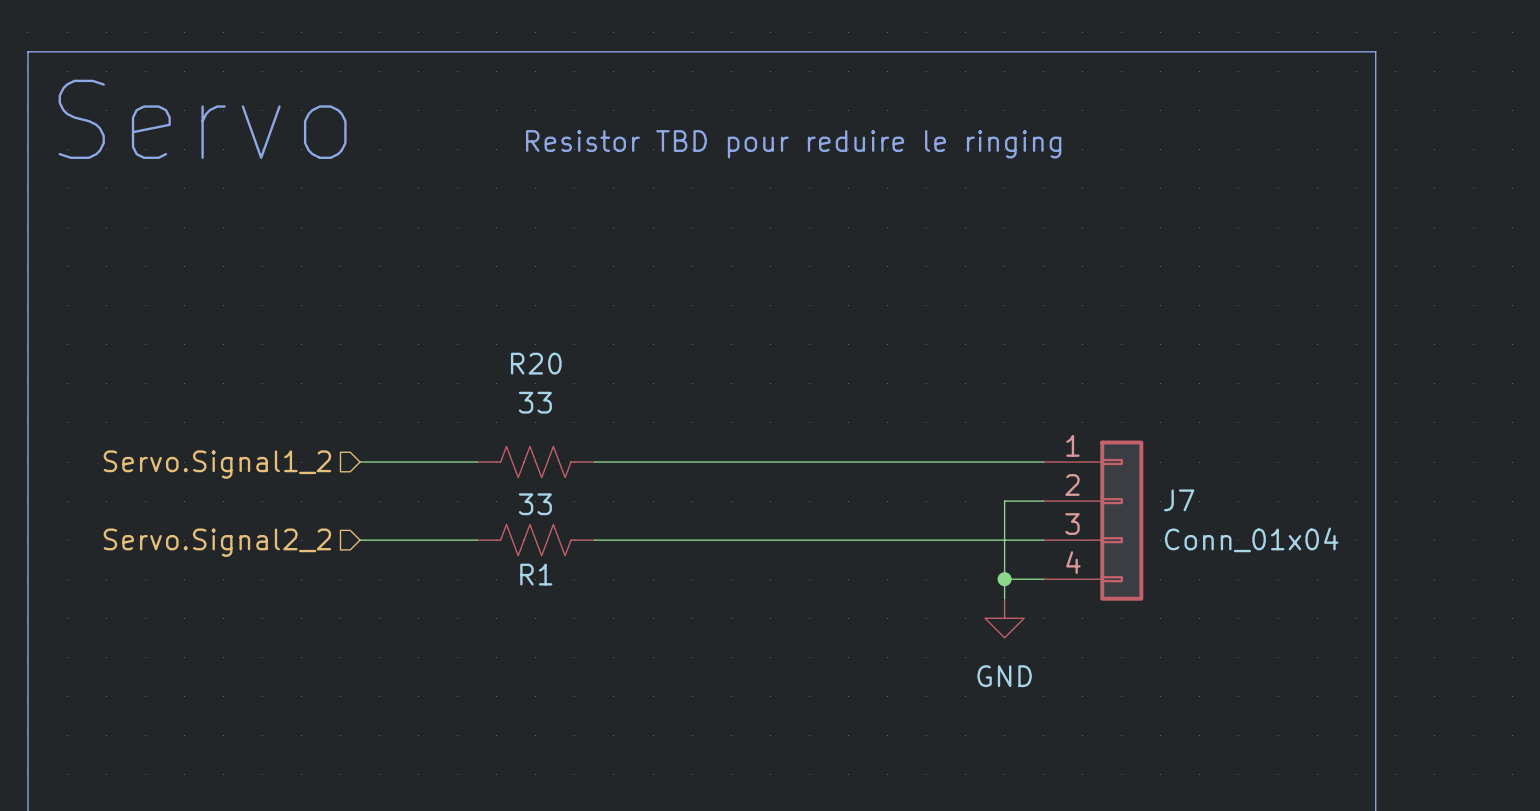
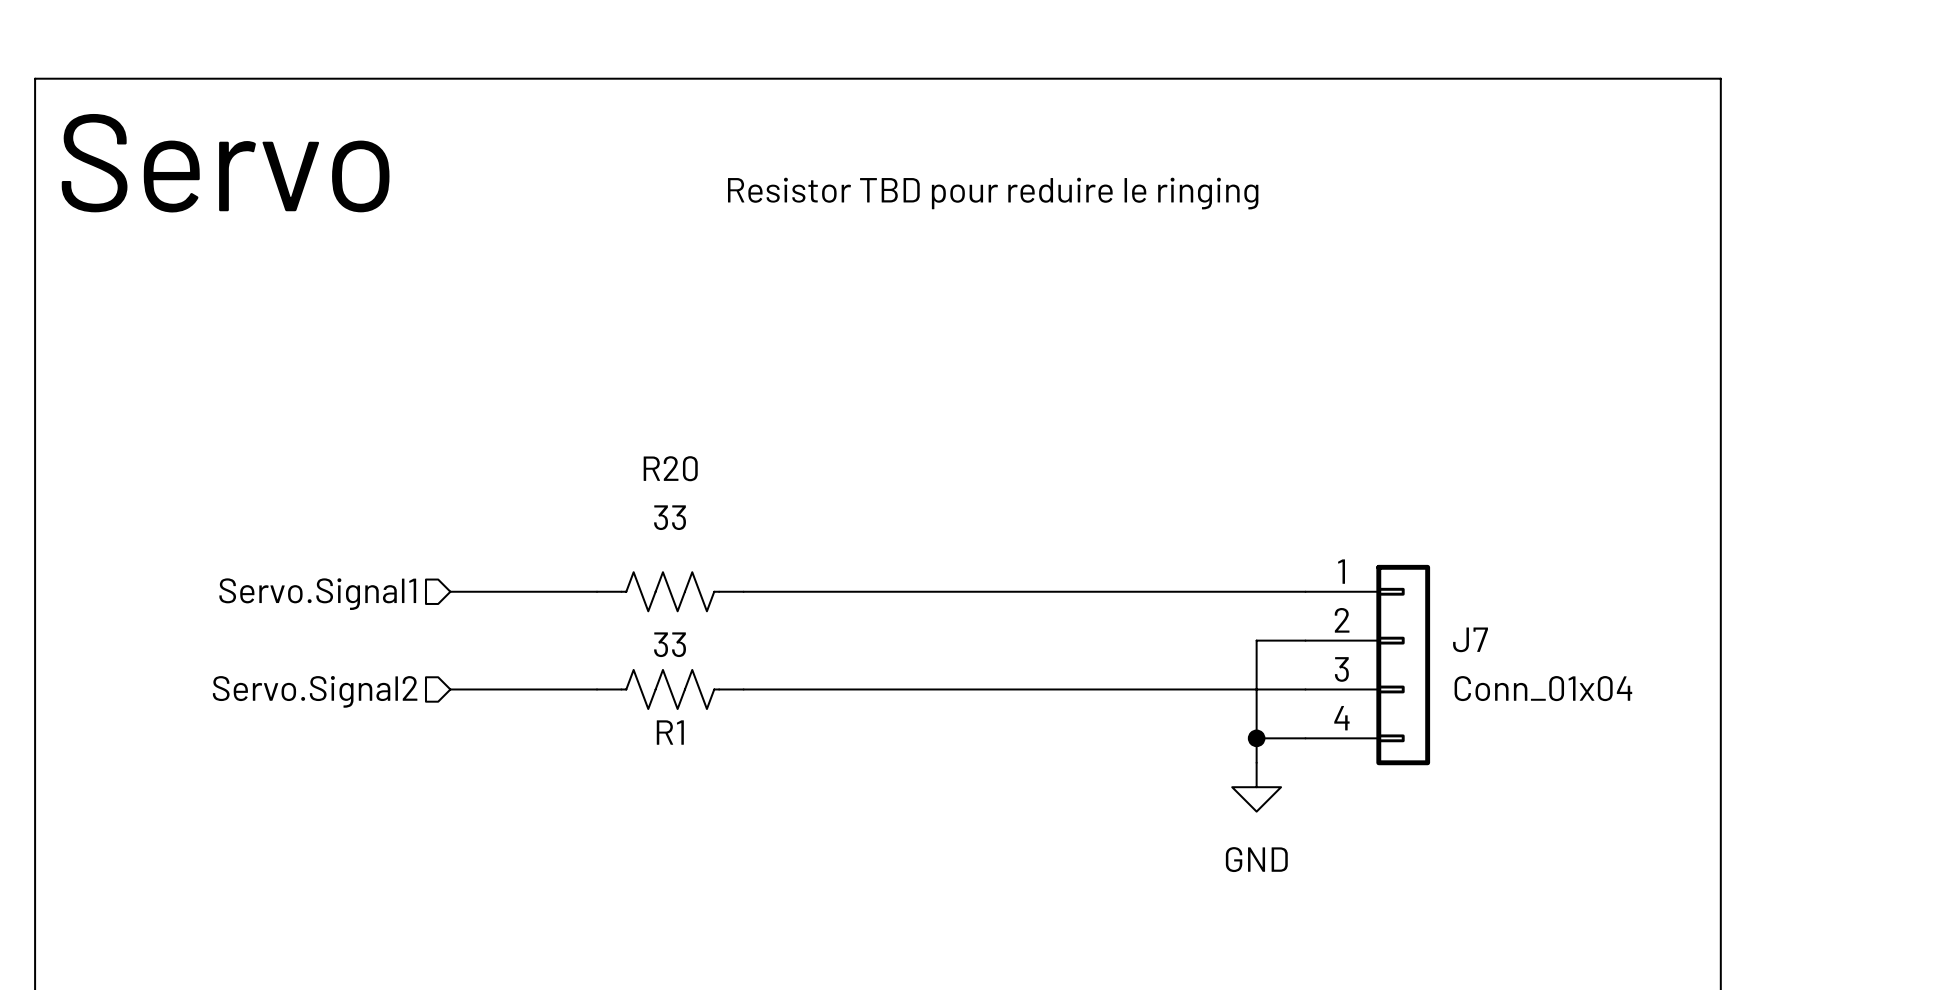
hierarchical label: Servo.Signal1_2 (217, 464) -> Servo.Signal1 (317, 594)
hierarchical label: Servo.Signal2_2 (217, 542) -> Servo.Signal2 (315, 691)

